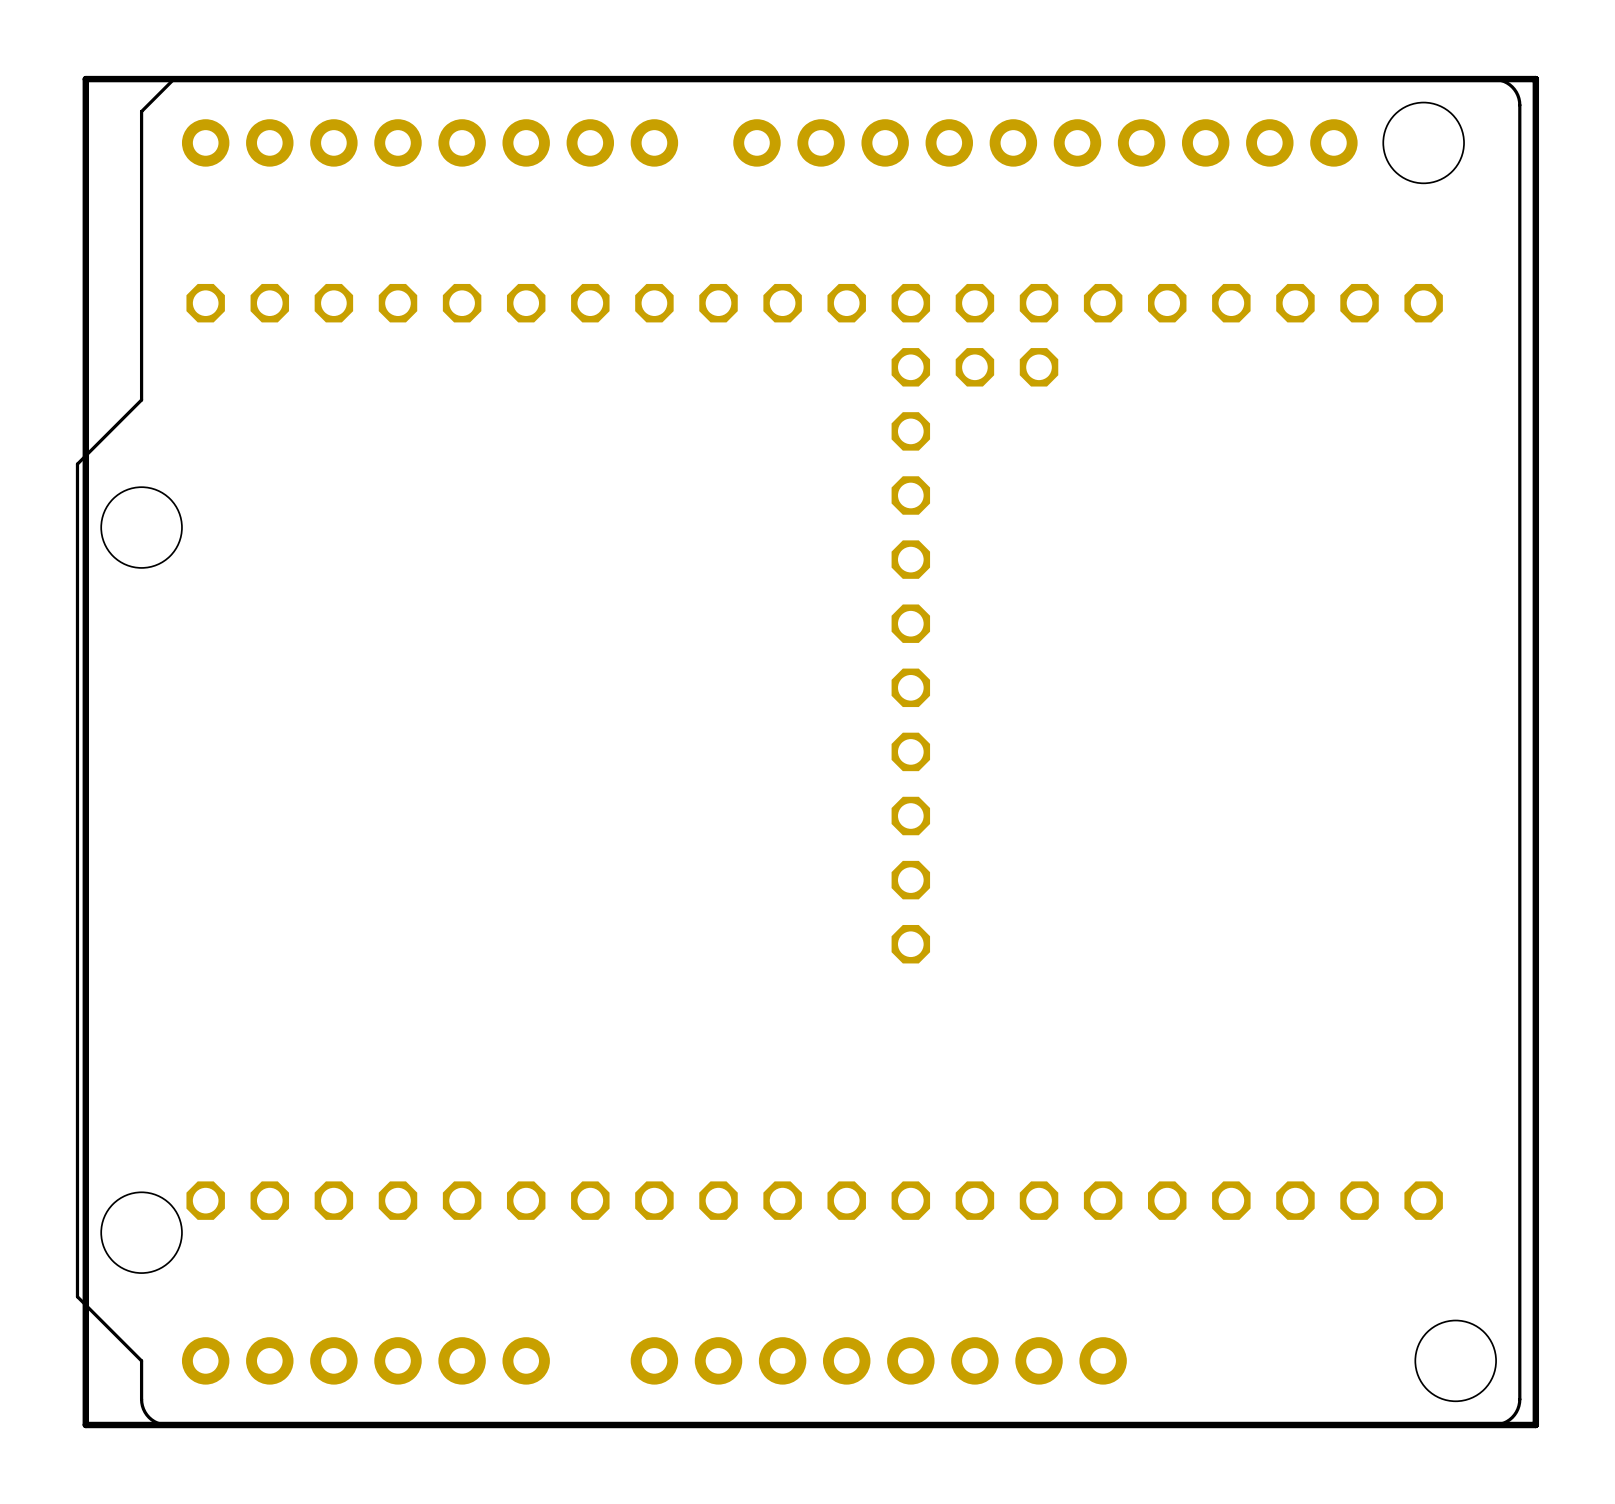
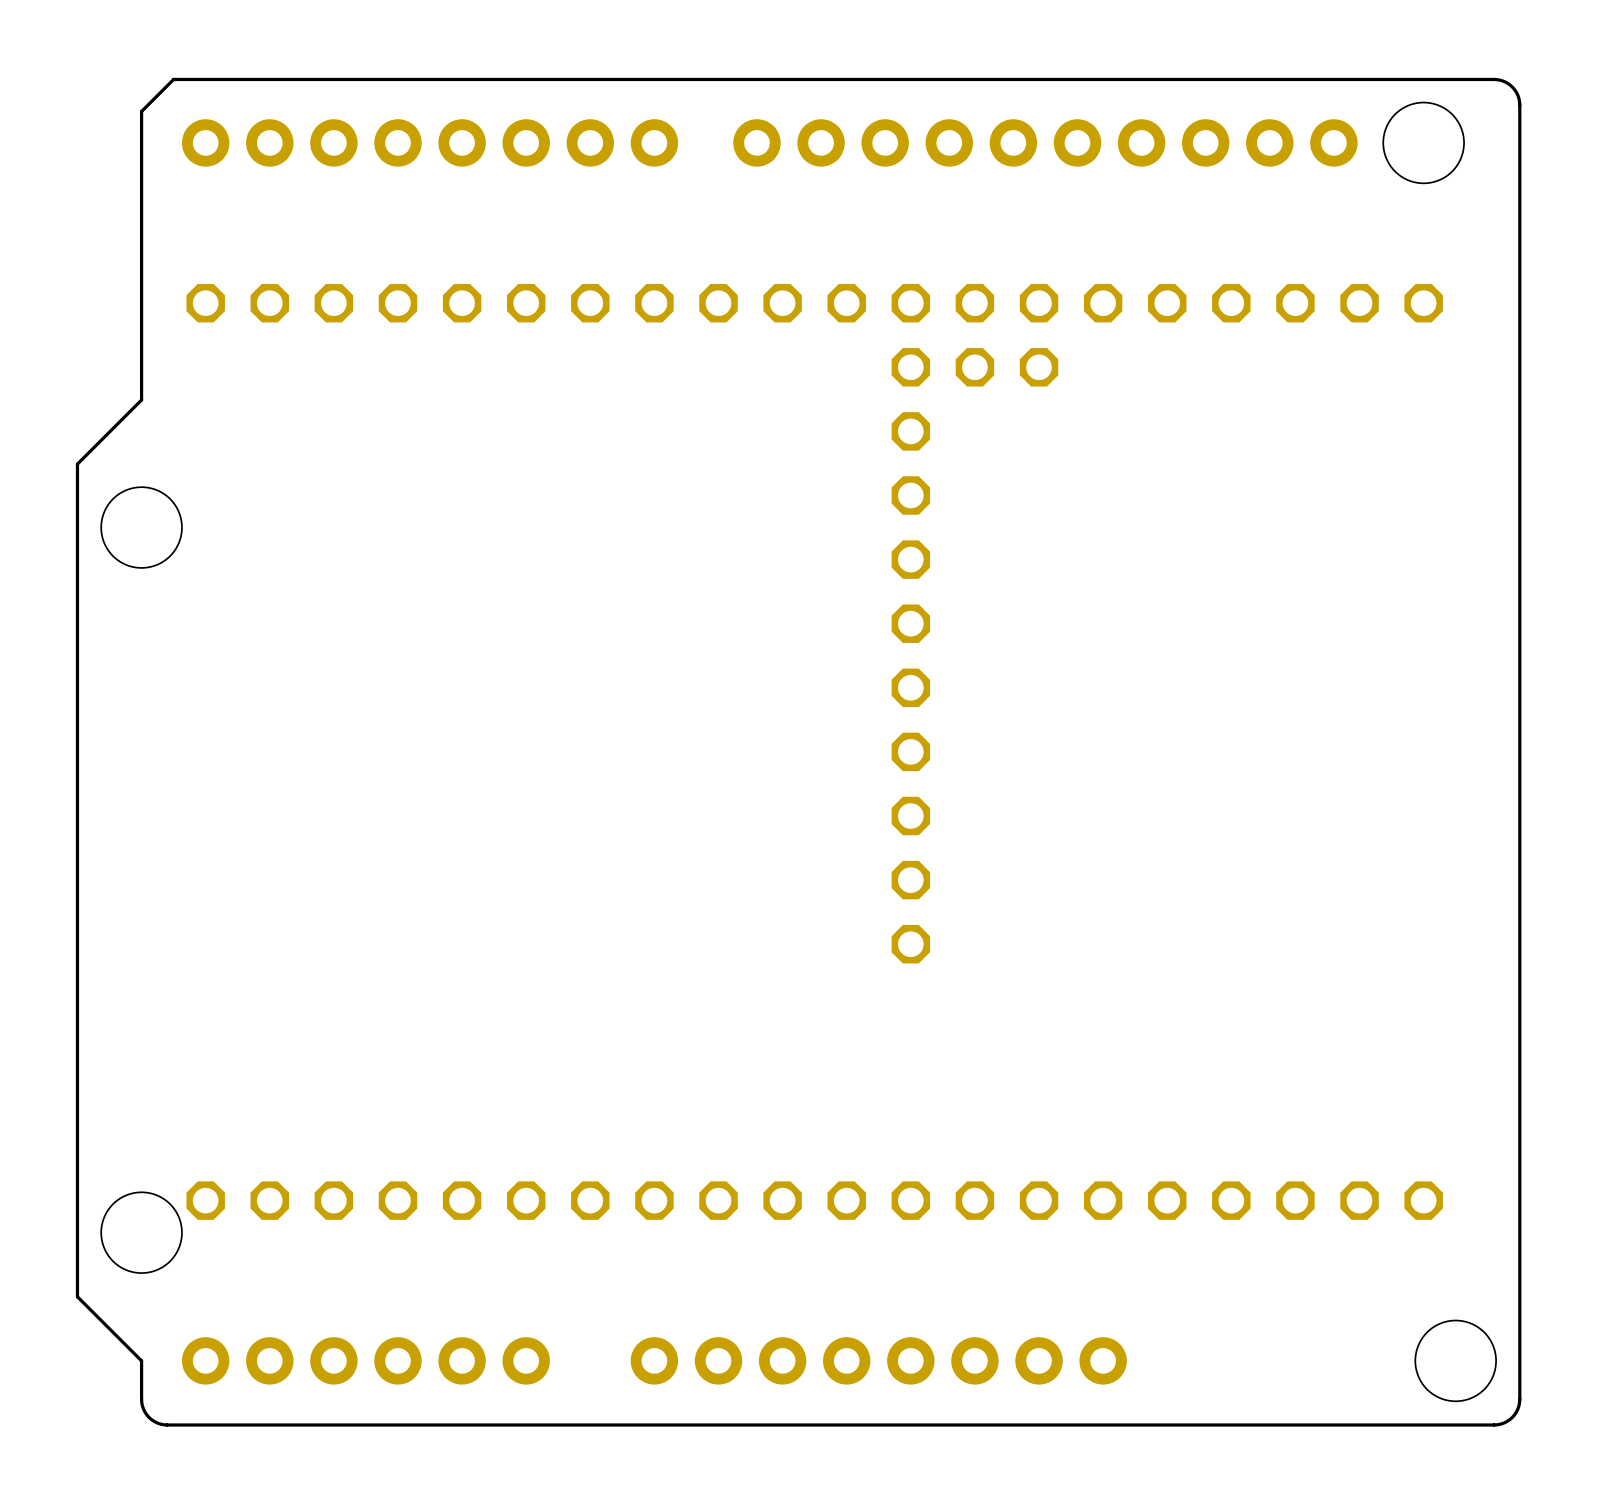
board edge: (1535, 79) (85, 79) (85, 1424) (1535, 1424) (1535, 79) -> none

